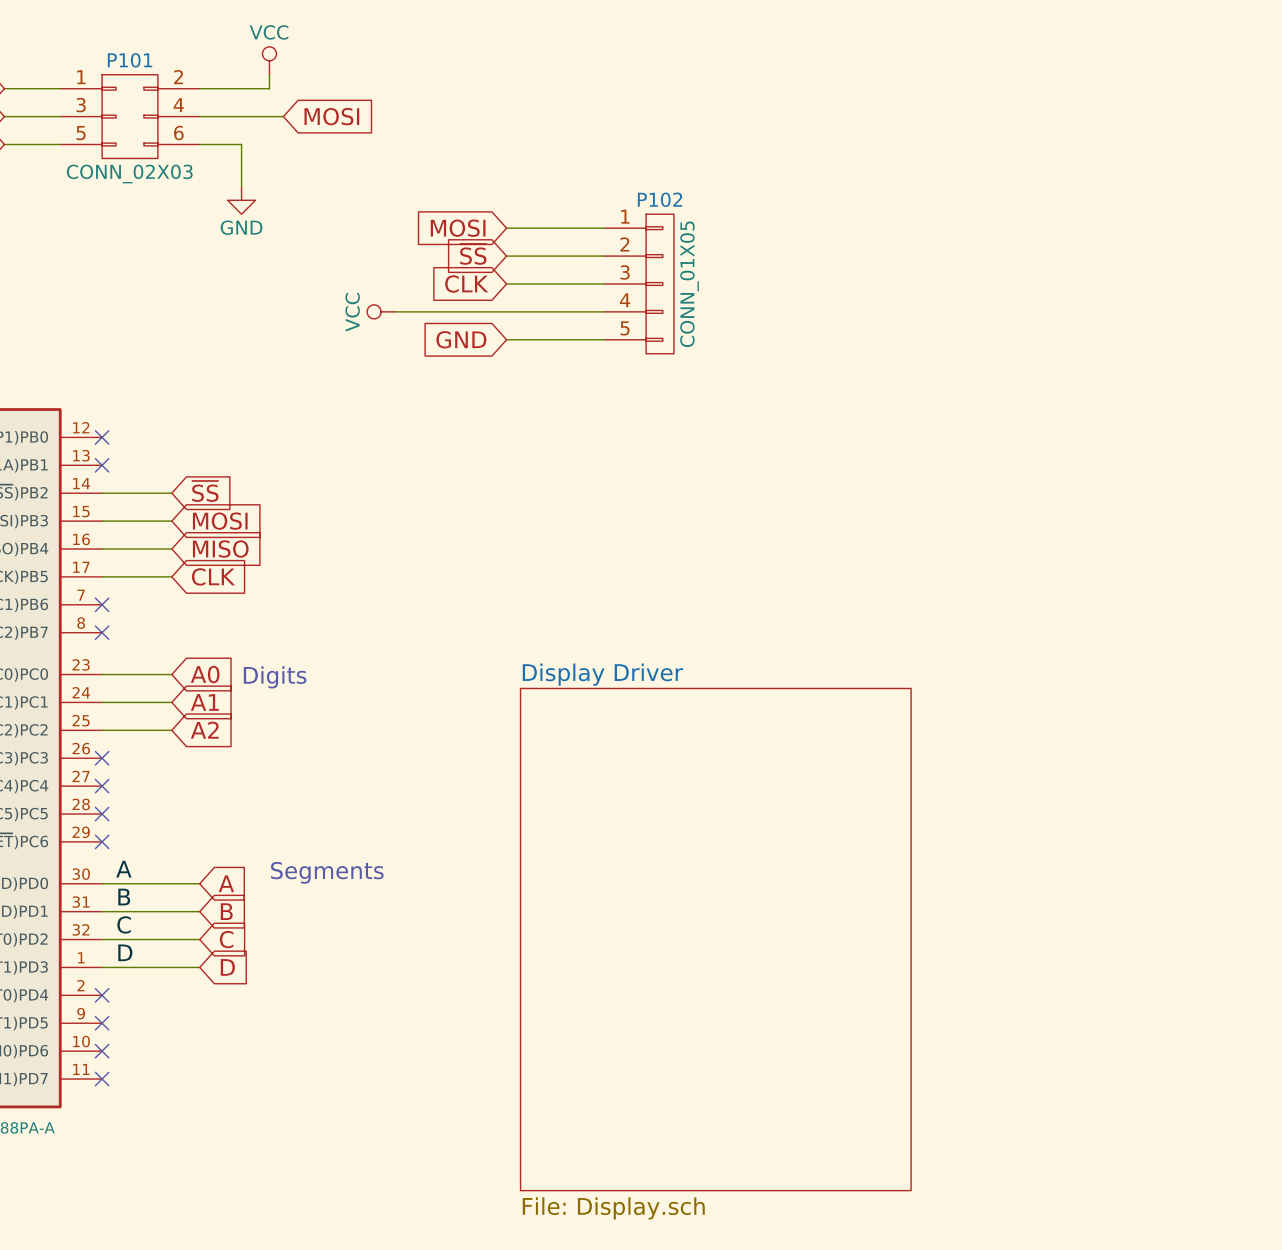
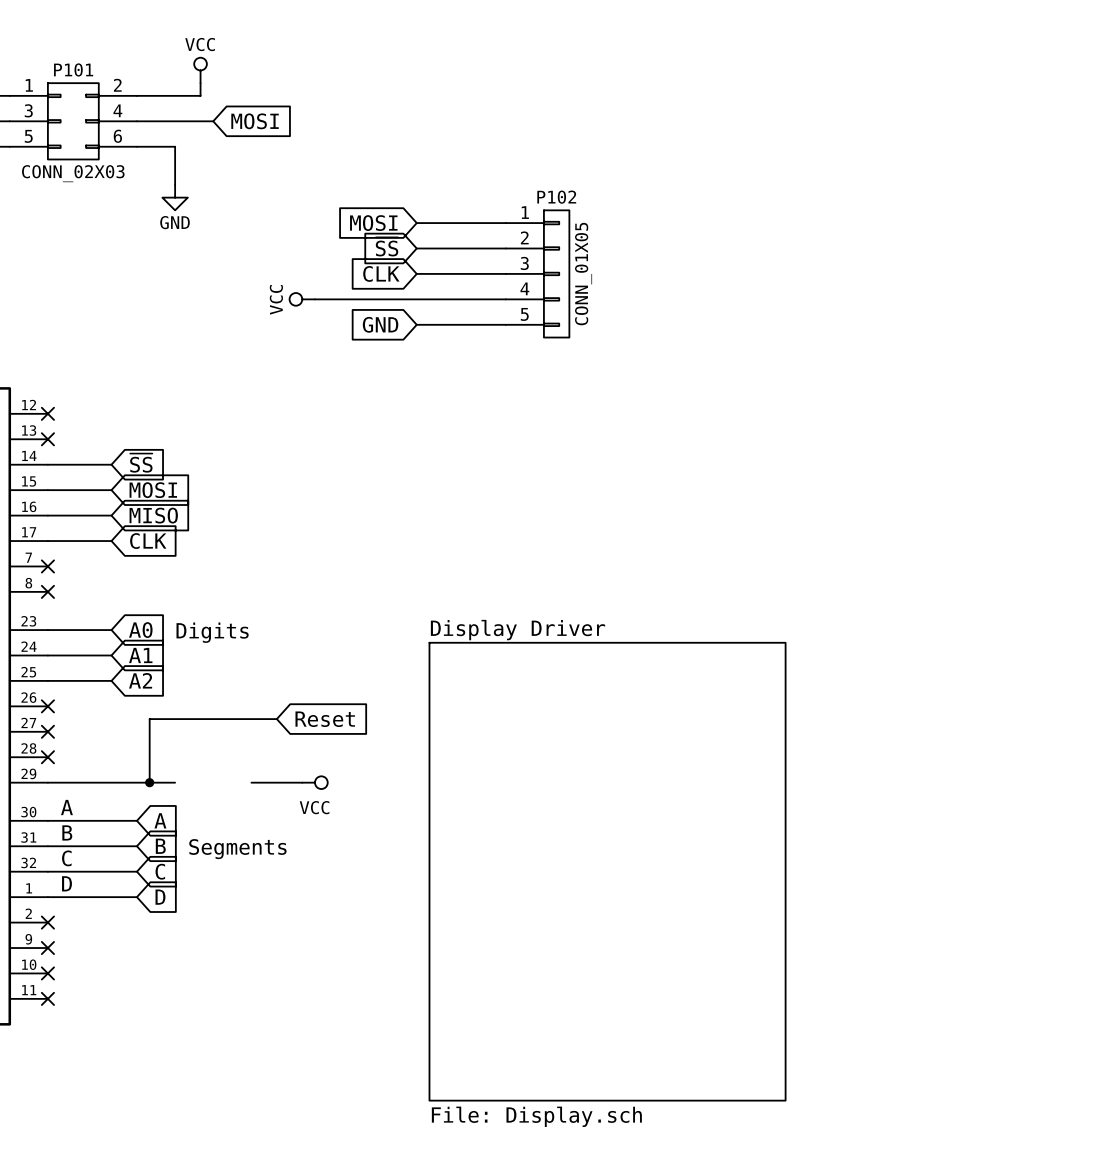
wire: none -> (276, 719) (149, 719) (149, 782)
global label: none -> Reset (325, 719)
wire: none -> (47, 782) (175, 782)
no-connect mark: (102, 841) -> none
junction: none -> (149, 782)
wire: none -> (251, 782) (302, 782)
power symbol: none -> VCC (315, 782)
text position: Segments (327, 872) -> Segments (237, 849)

